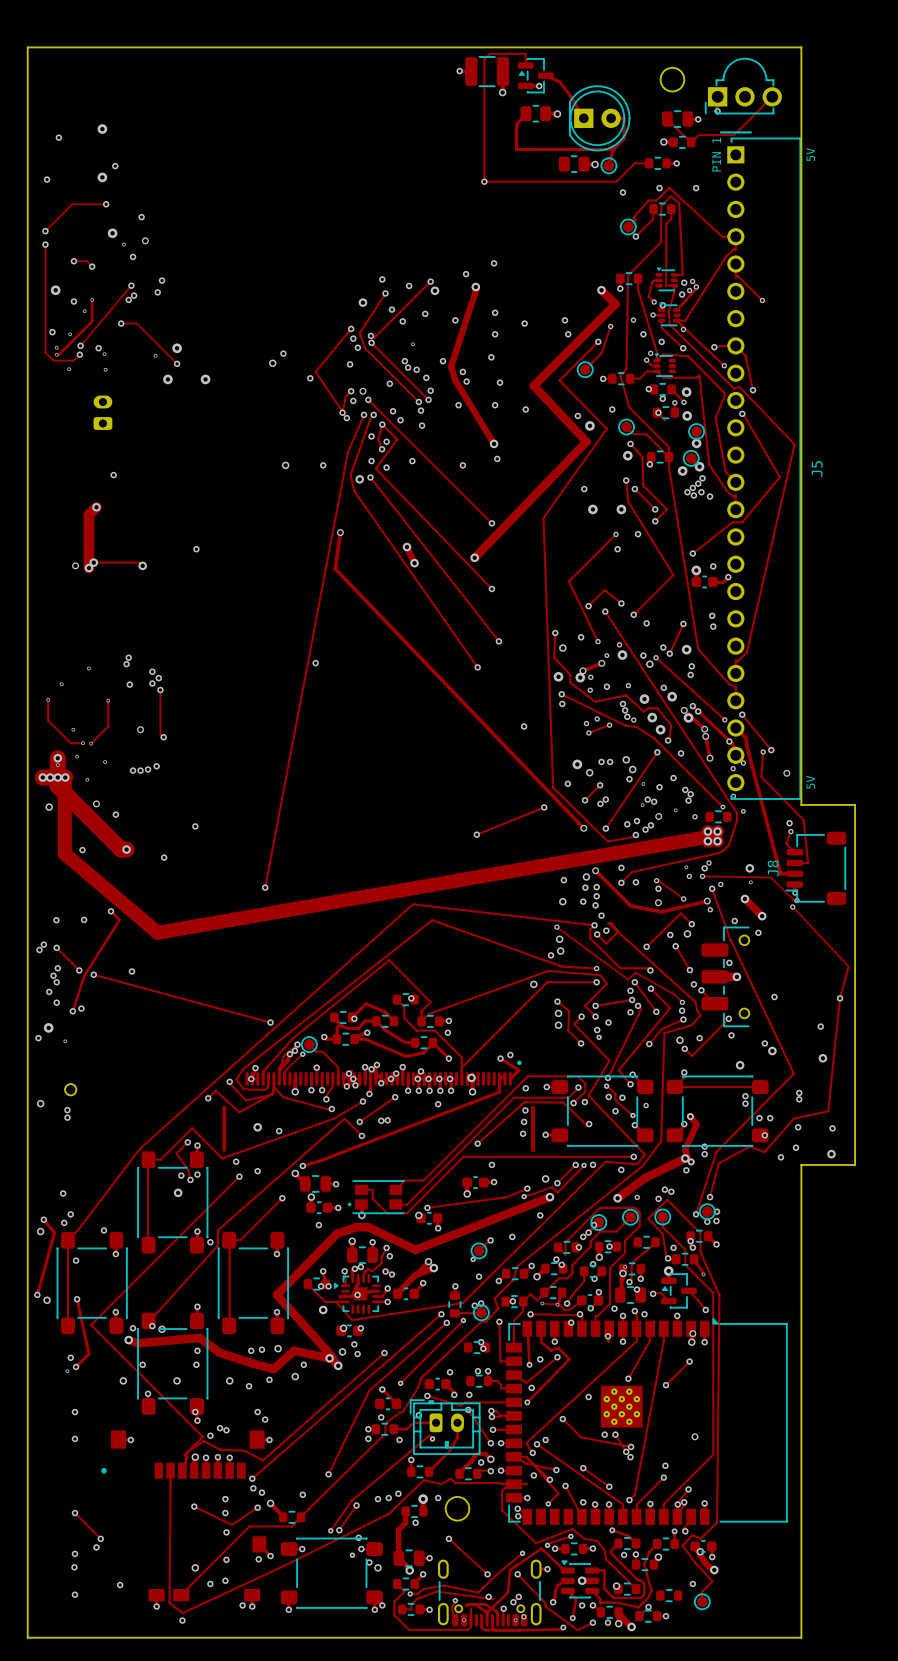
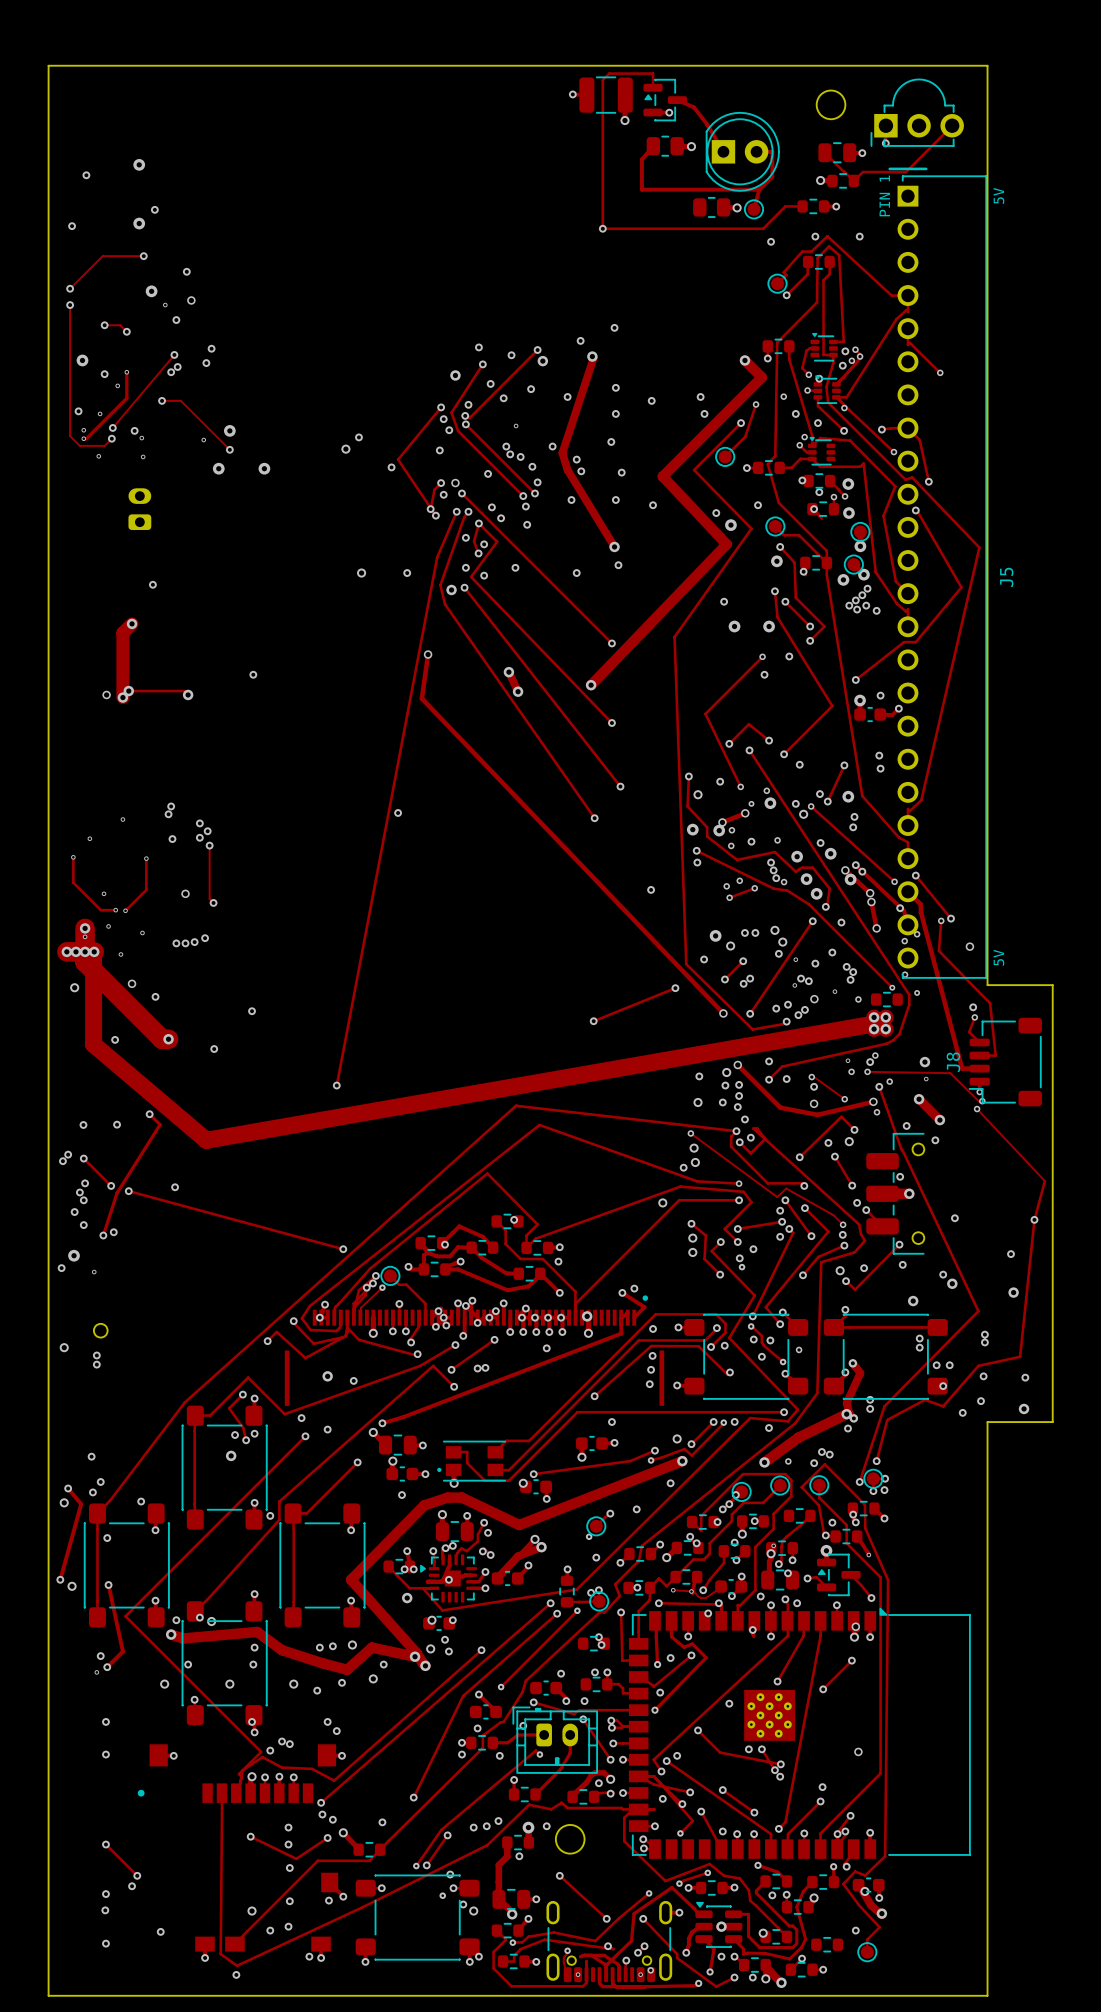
via: none -> (468, 404)

